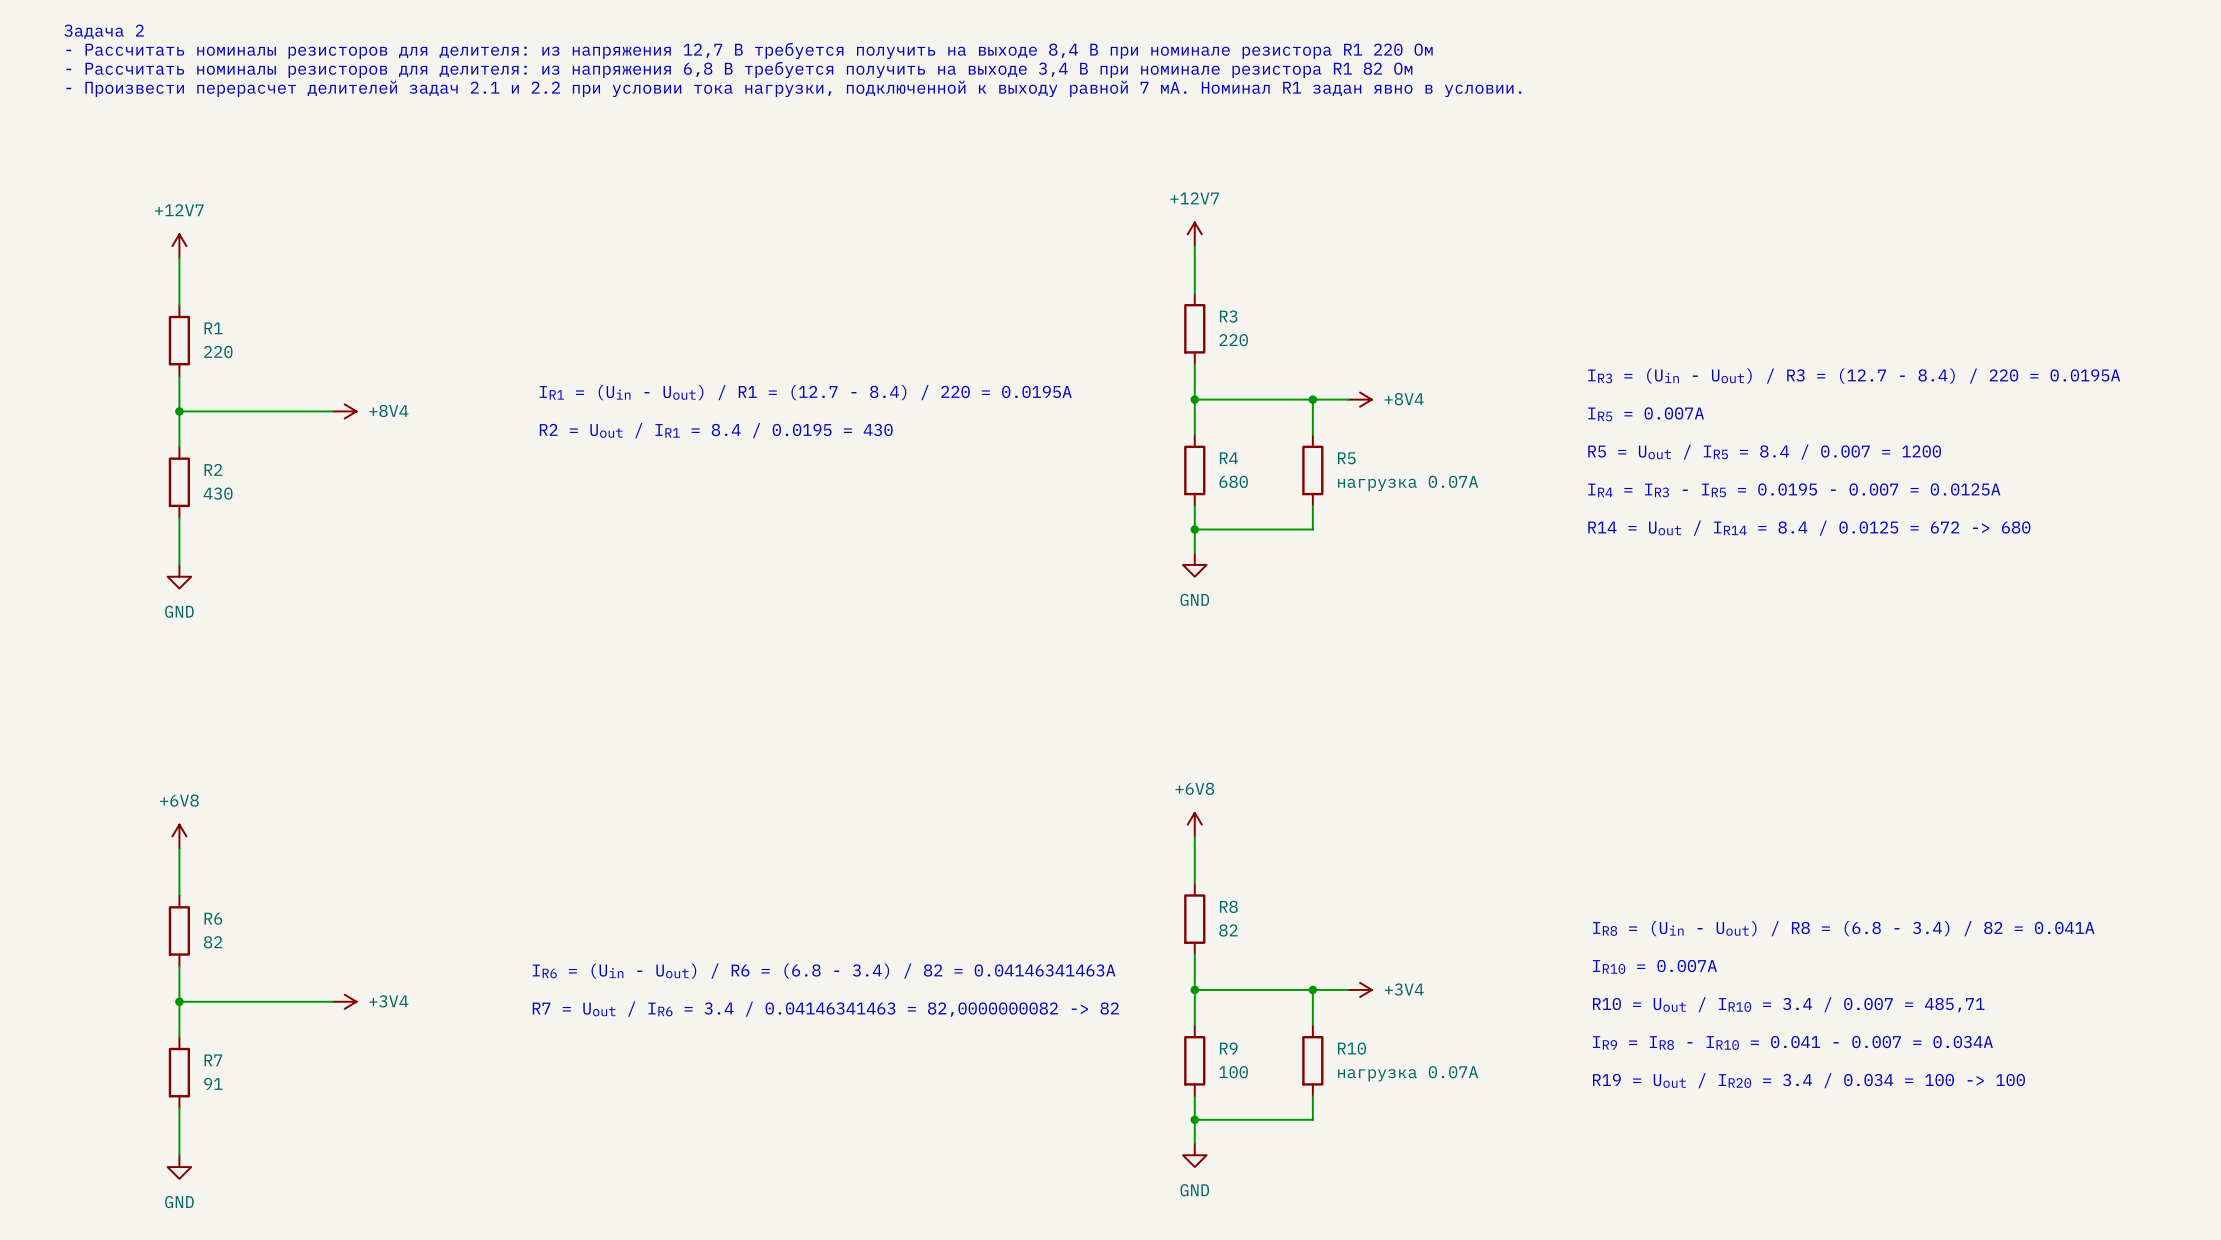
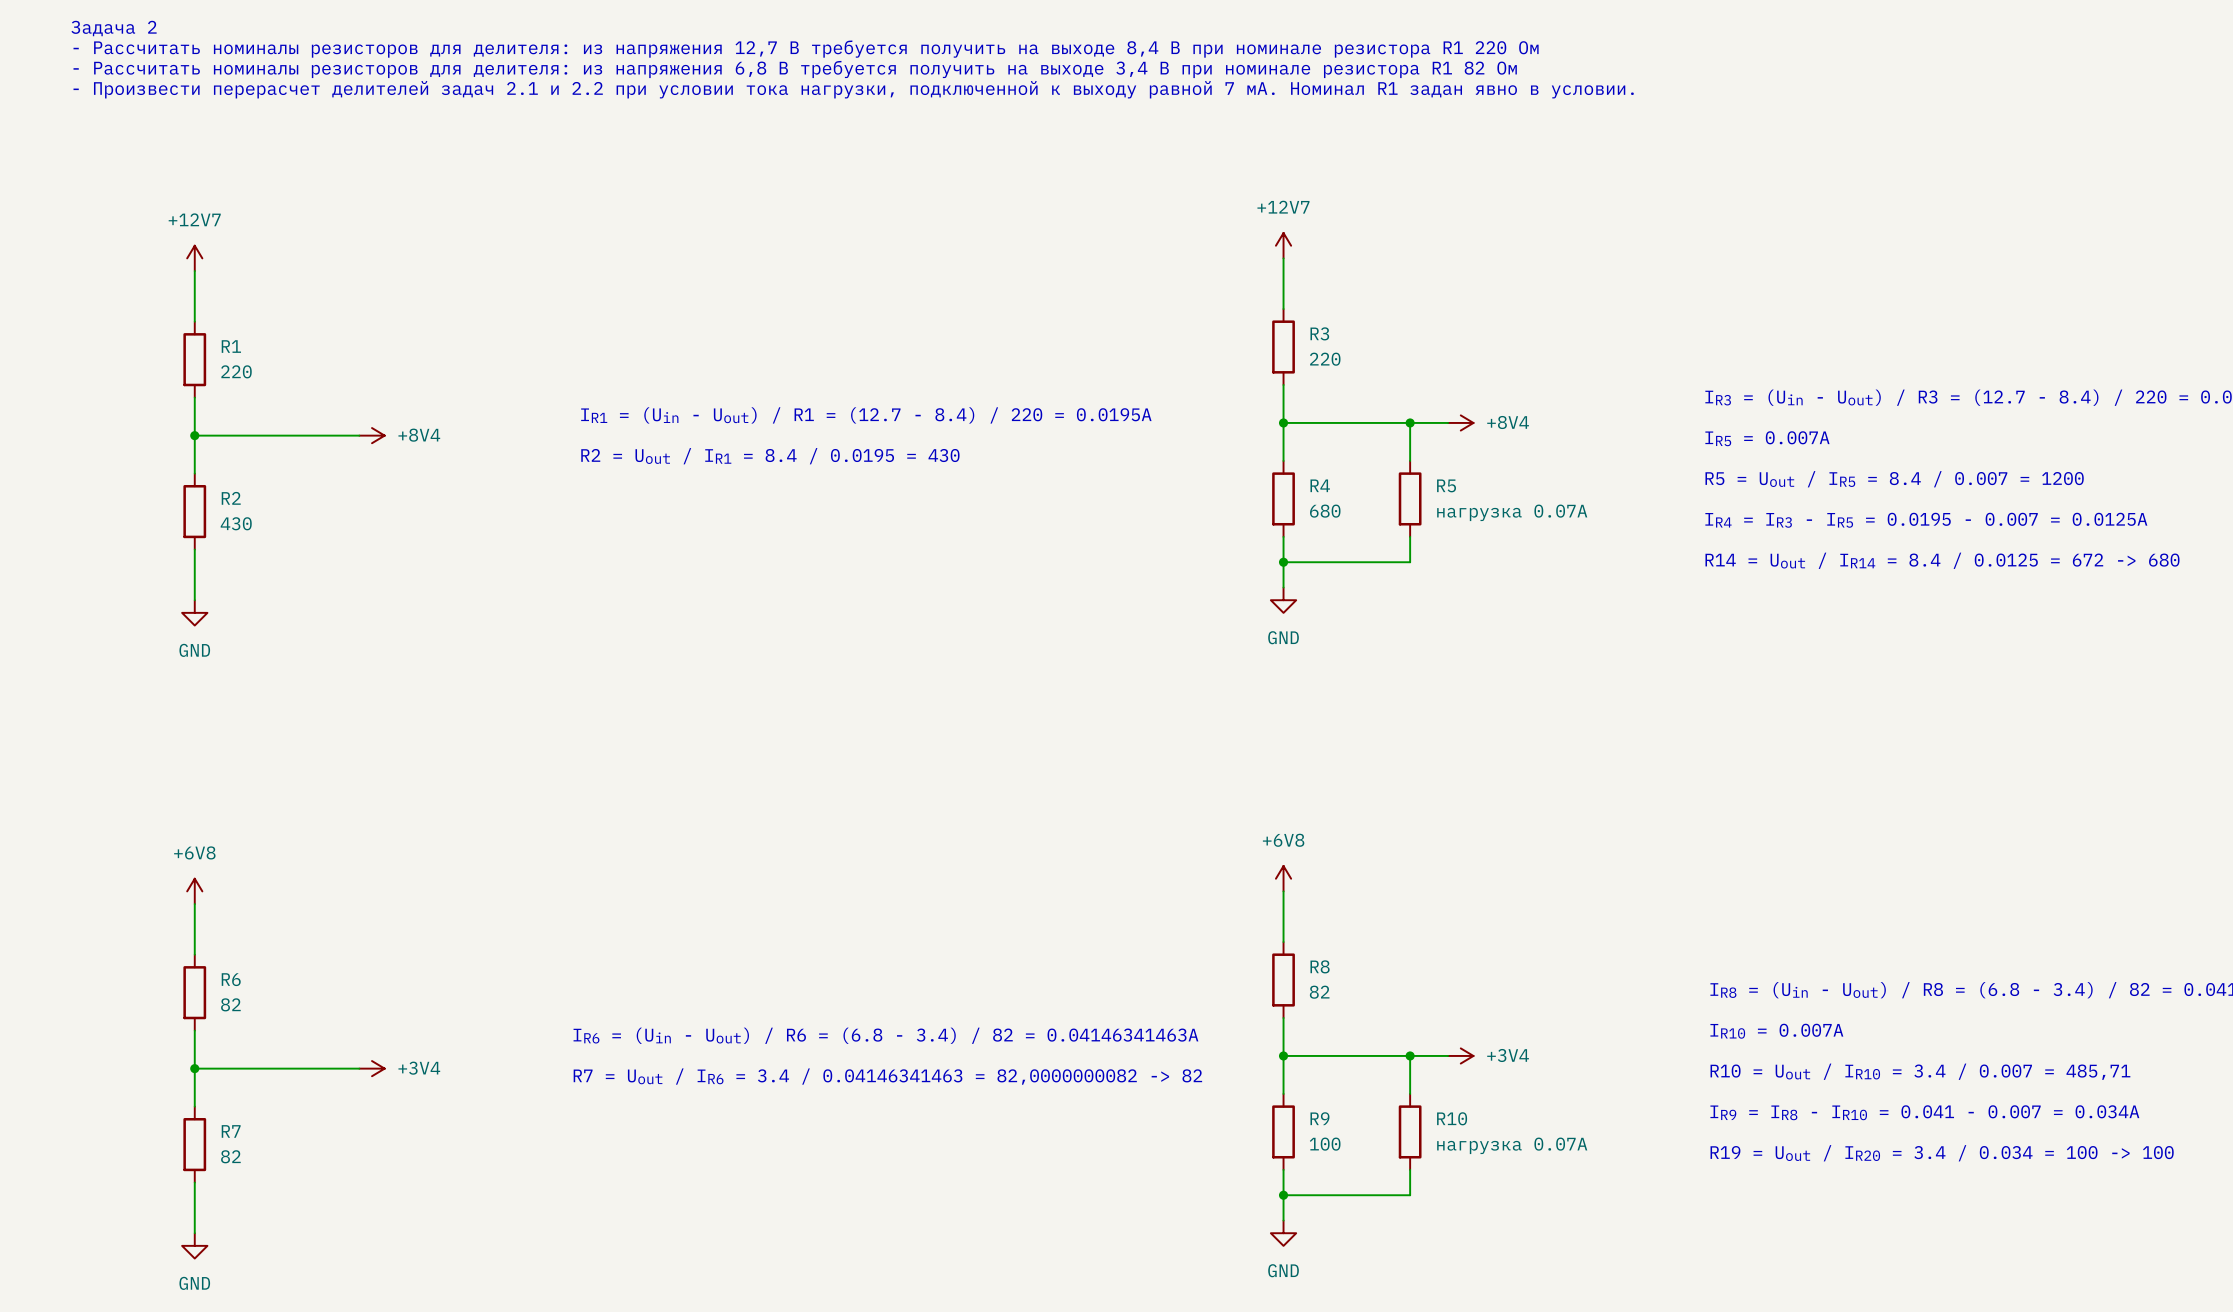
R7 value: 91 (213, 1083) -> 82 (230, 1156)

